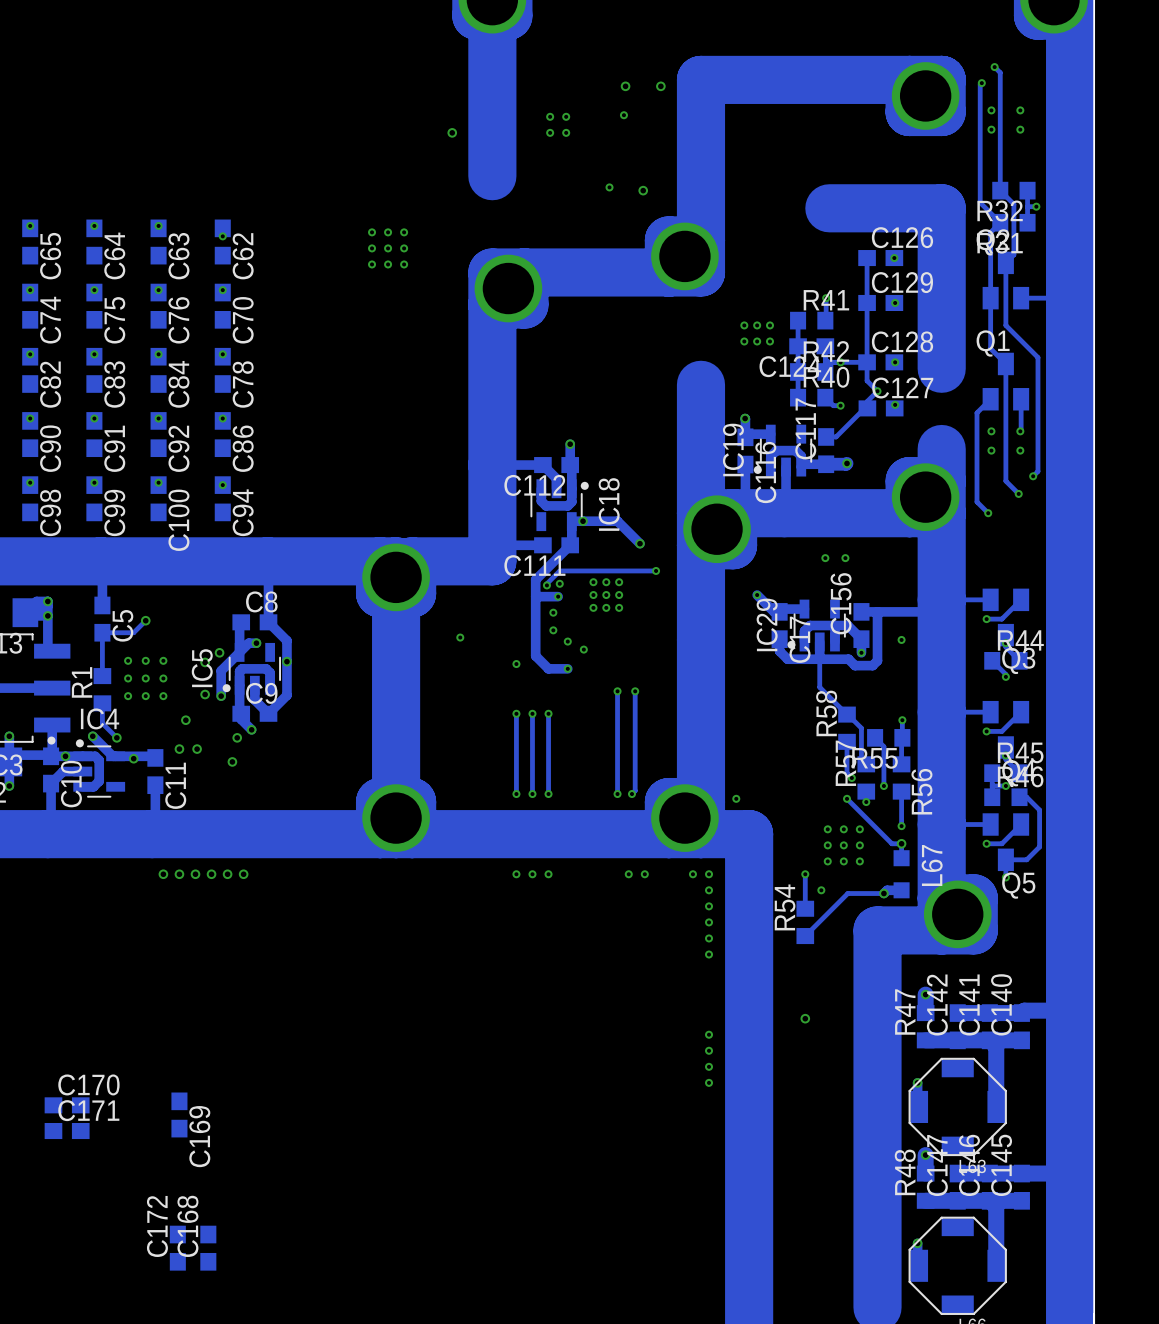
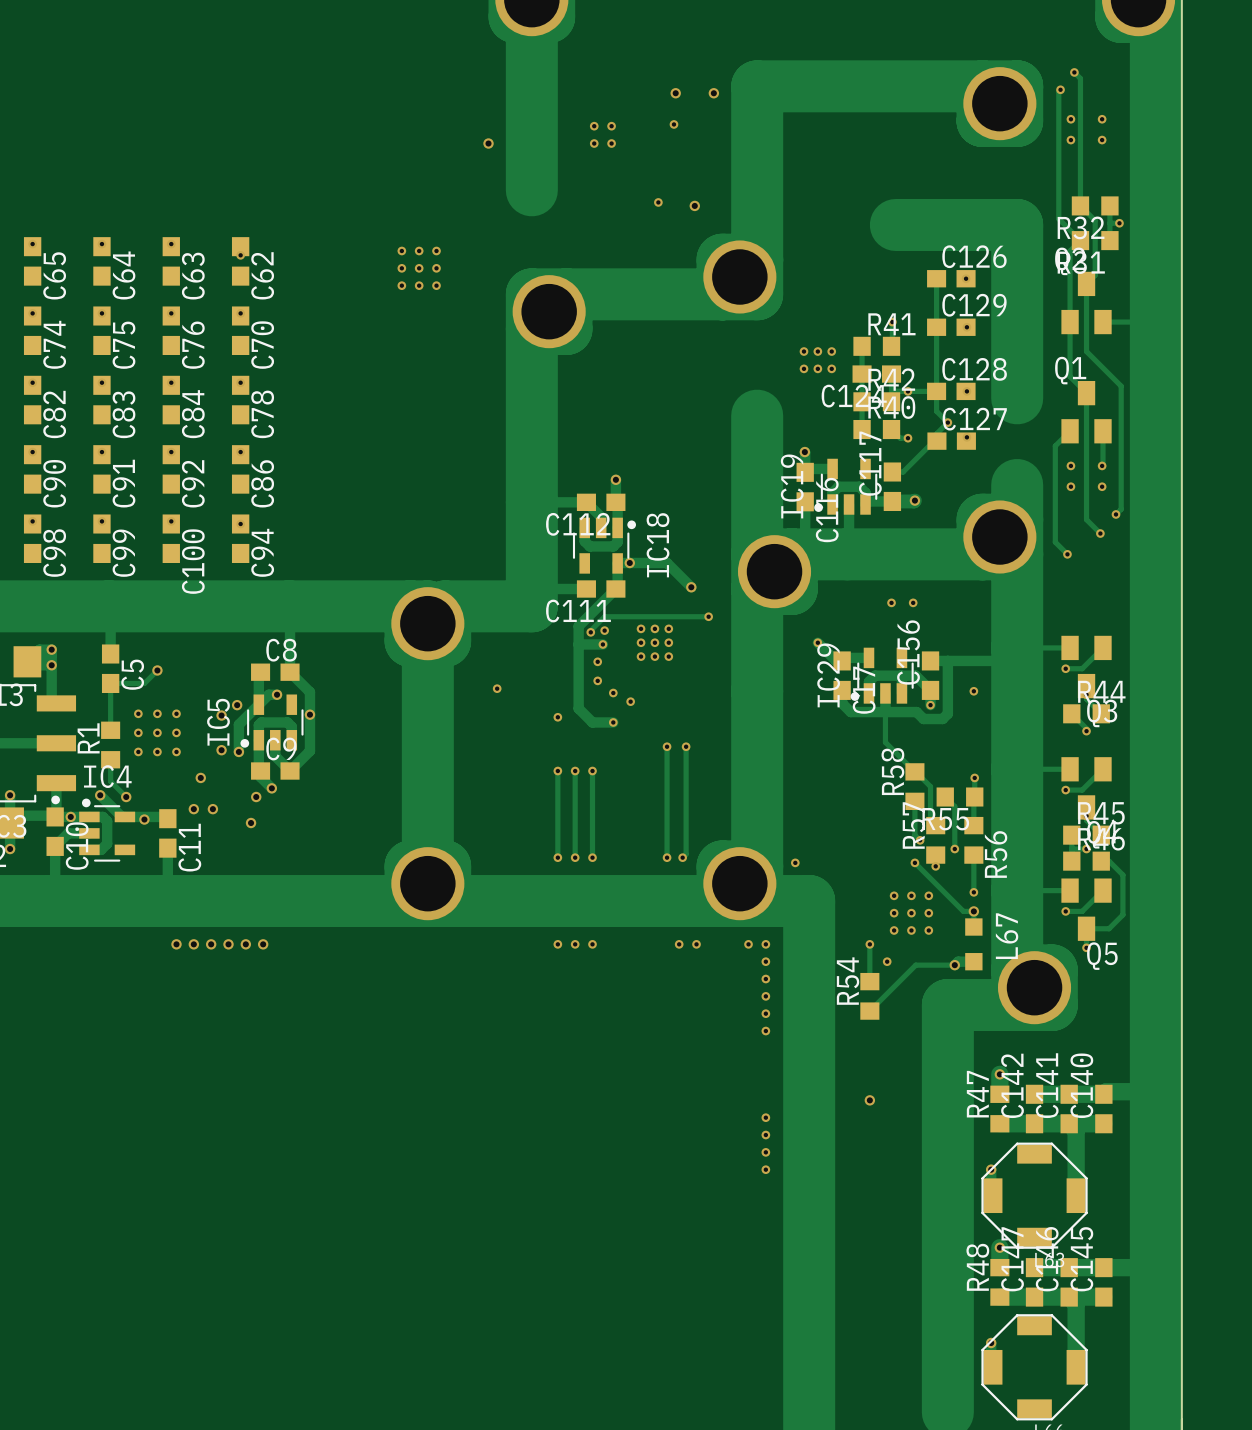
C170: (67, 1105) -> none
C169: (179, 1114) -> none
C171: (67, 1131) -> none
C172: (177, 1248) -> none
C168: (208, 1248) -> none

